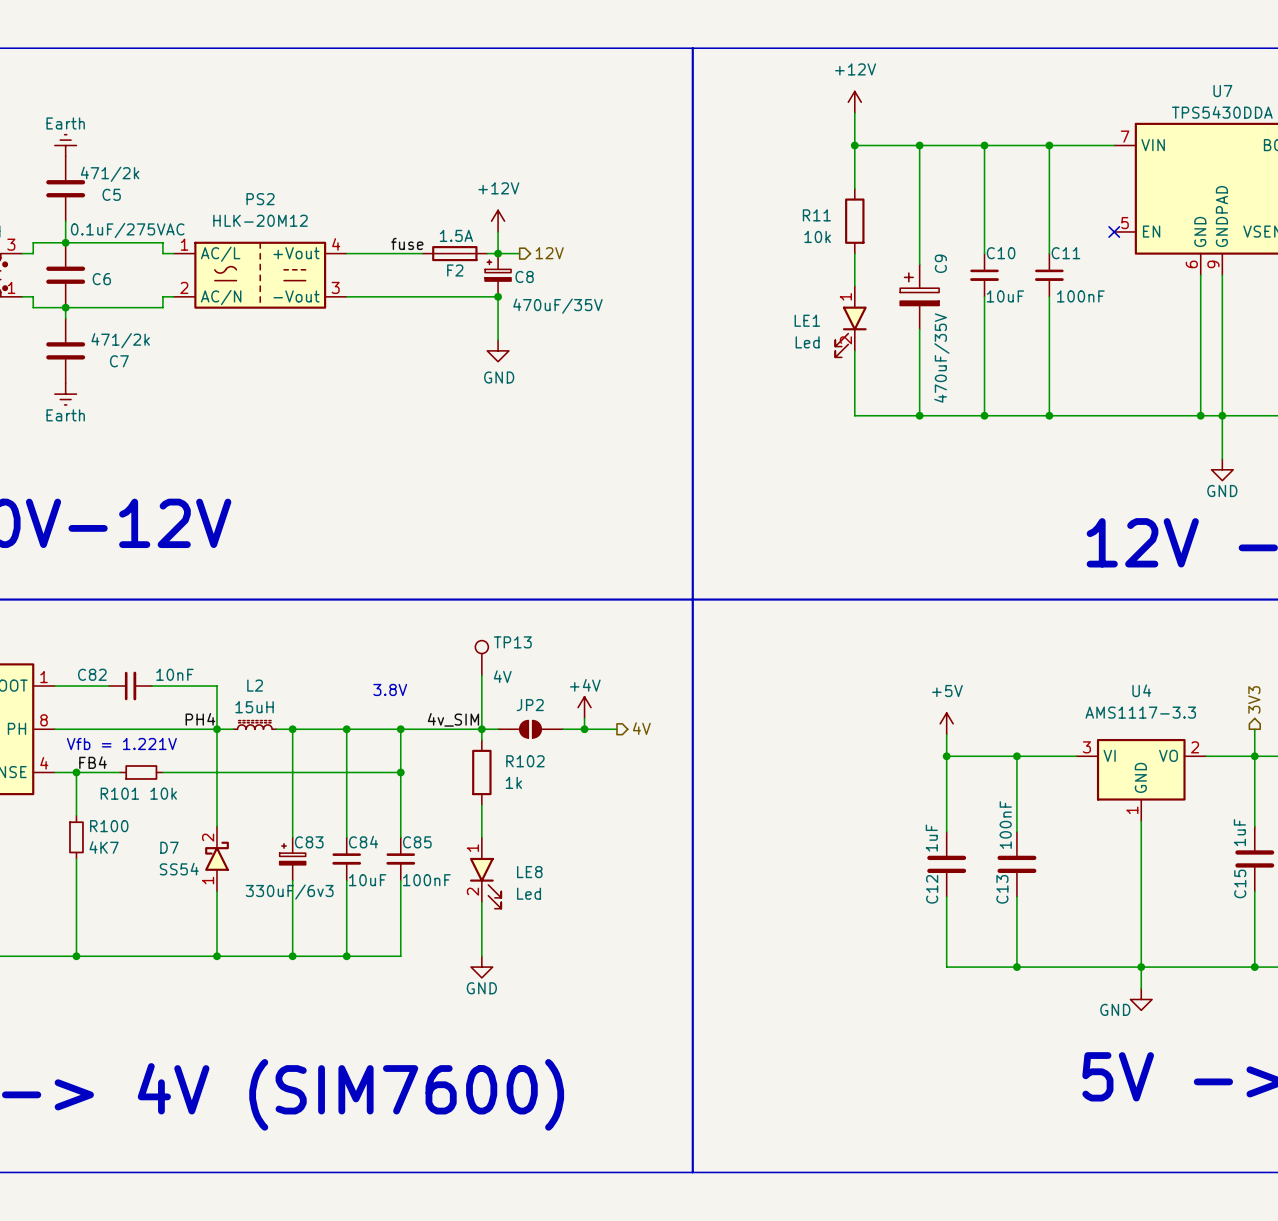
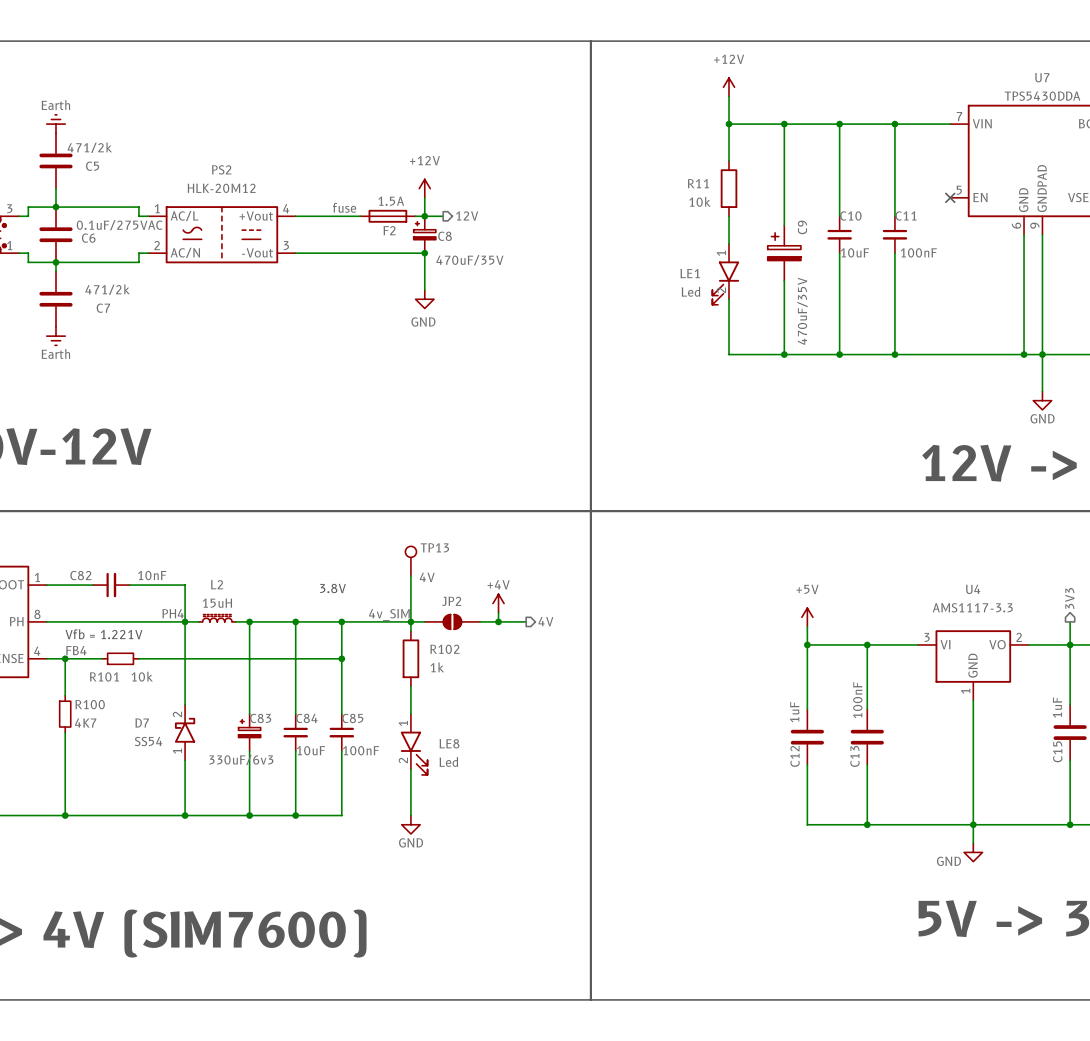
C6 value position: 0.1uF/275VAC (127, 230) -> 0.1uF/275VAC (119, 225)

